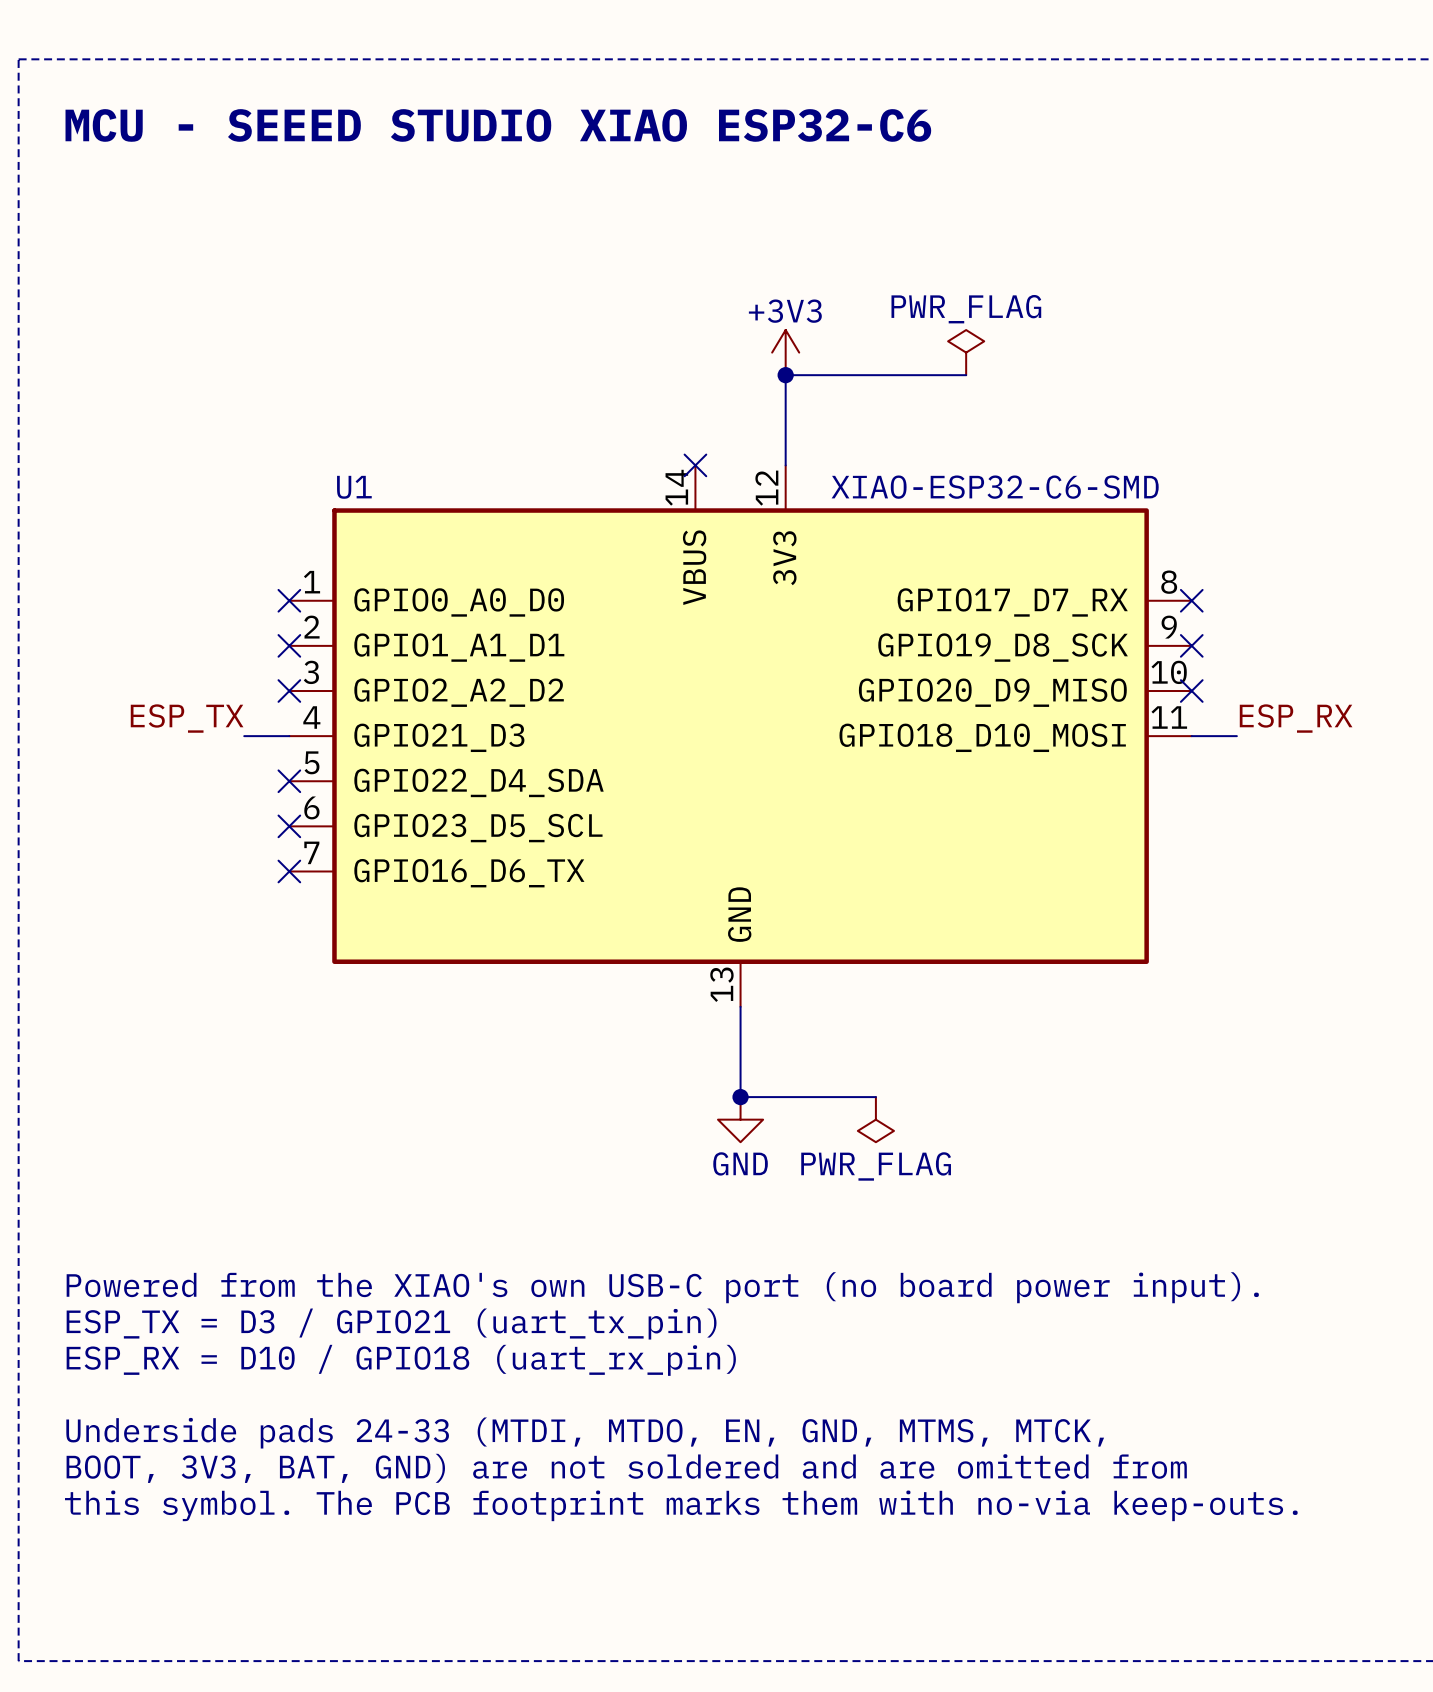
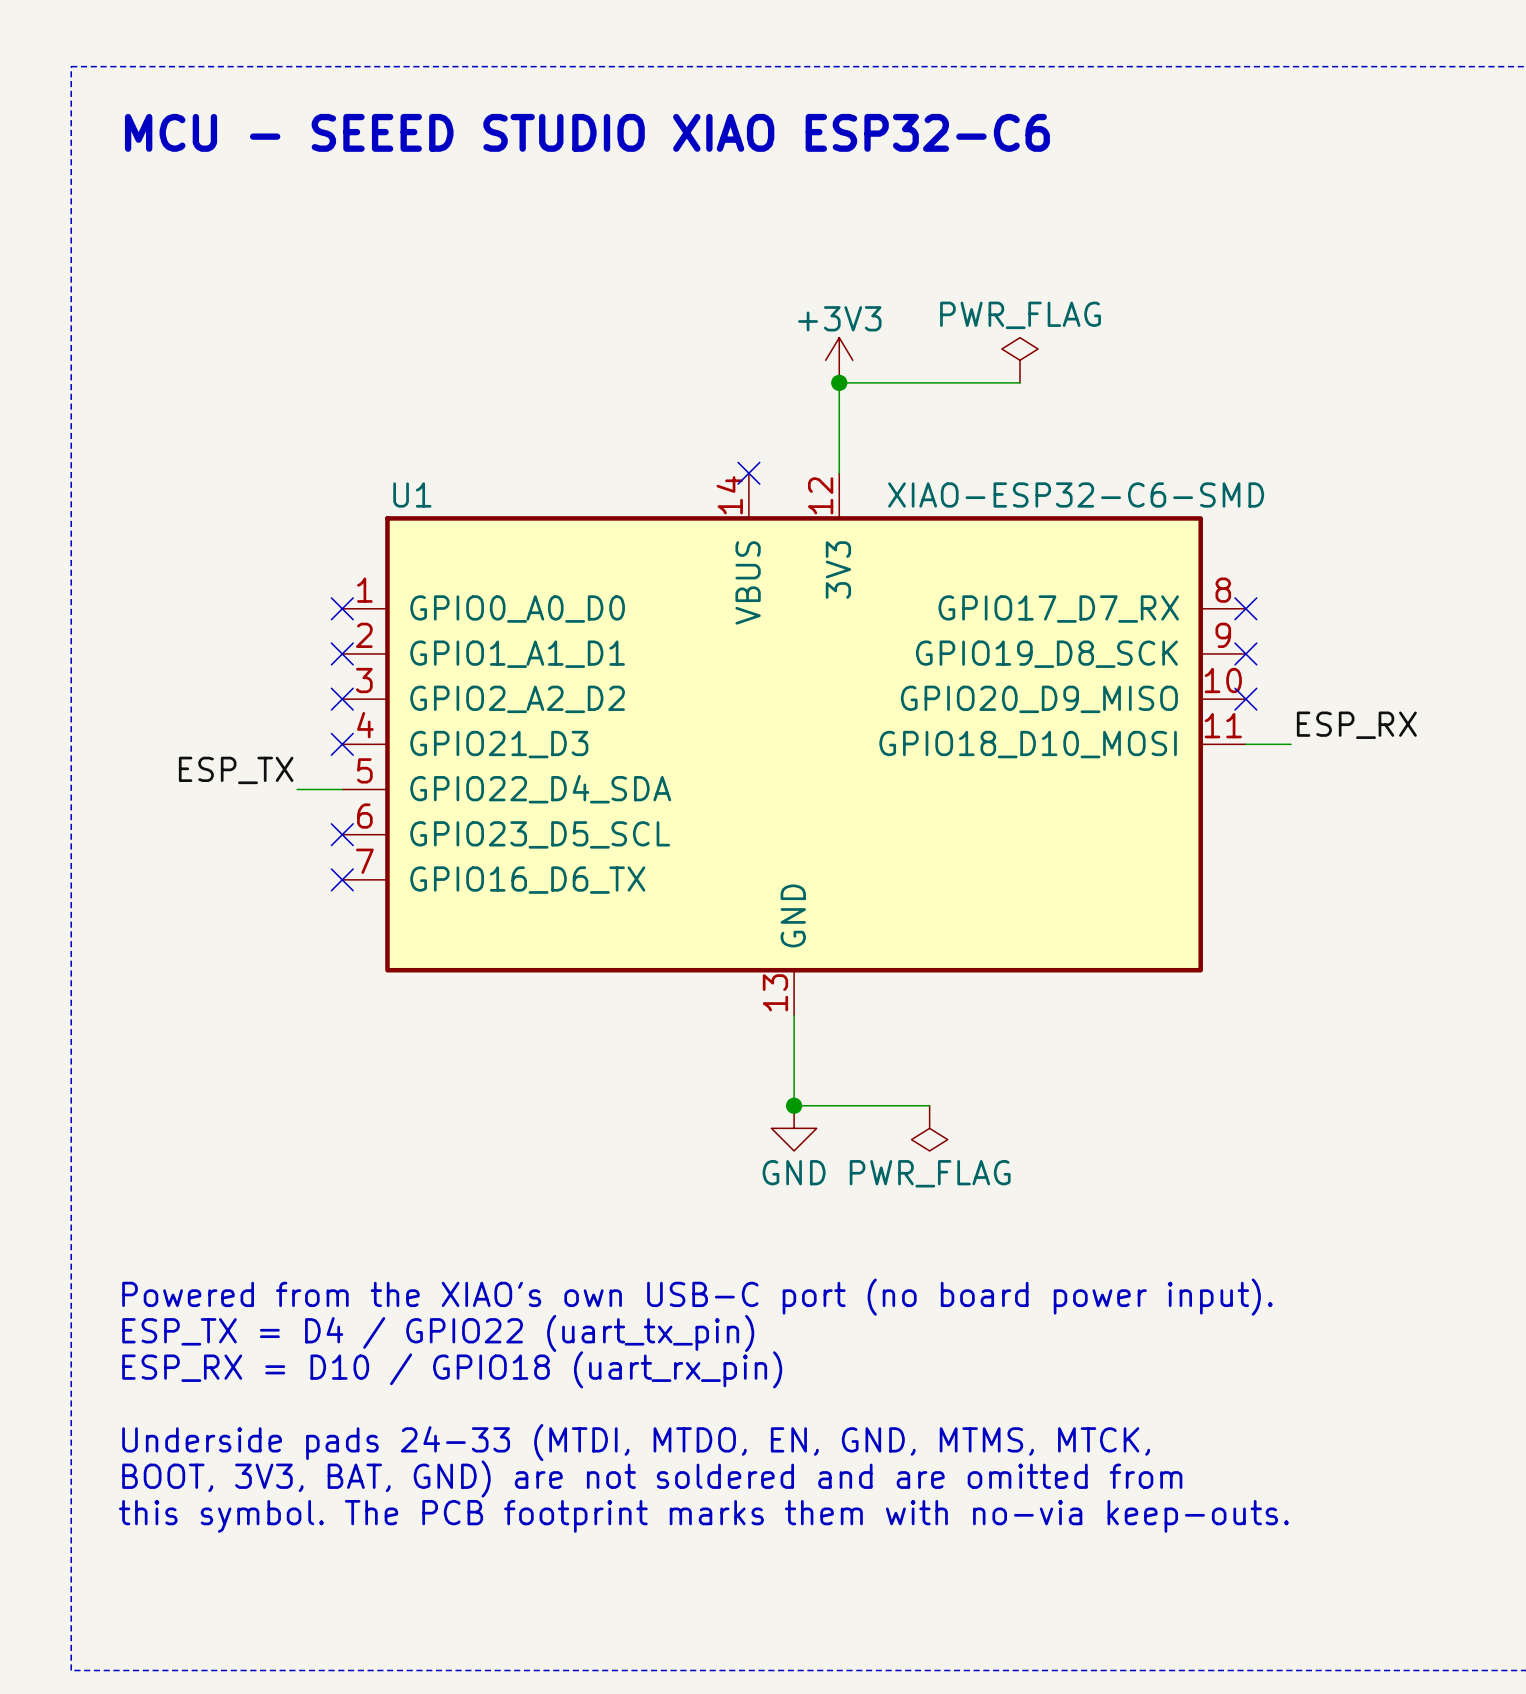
label position: ESP_TX (187, 718) -> ESP_TX (236, 770)
wire: (244, 736) (289, 736) -> (297, 789) (342, 789)
no-connect mark position: (289, 781) -> (342, 744)
text: ESP_TX = D3 / GPIO21 (uart_tx_pin) (391, 1324) -> ESP_TX = D4 / GPIO22 (uart_tx_pin) (438, 1333)

